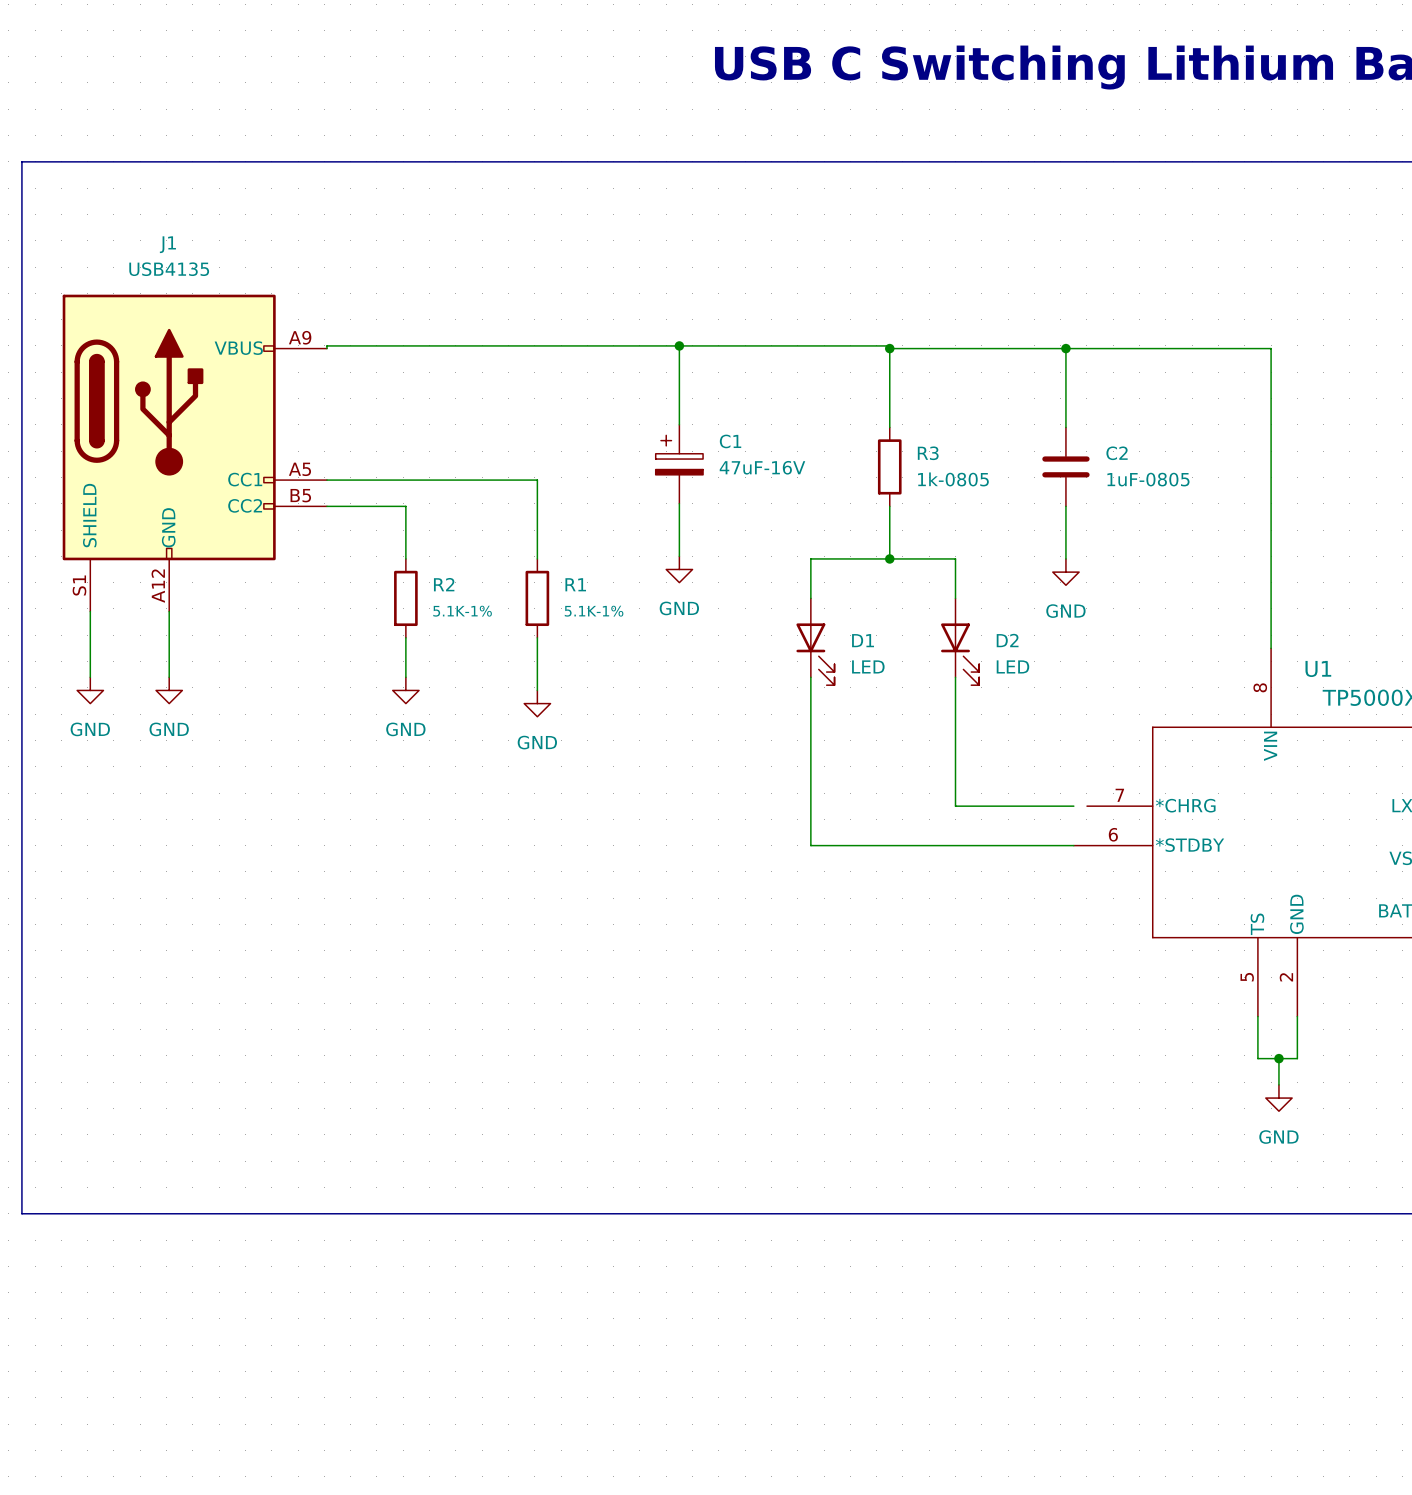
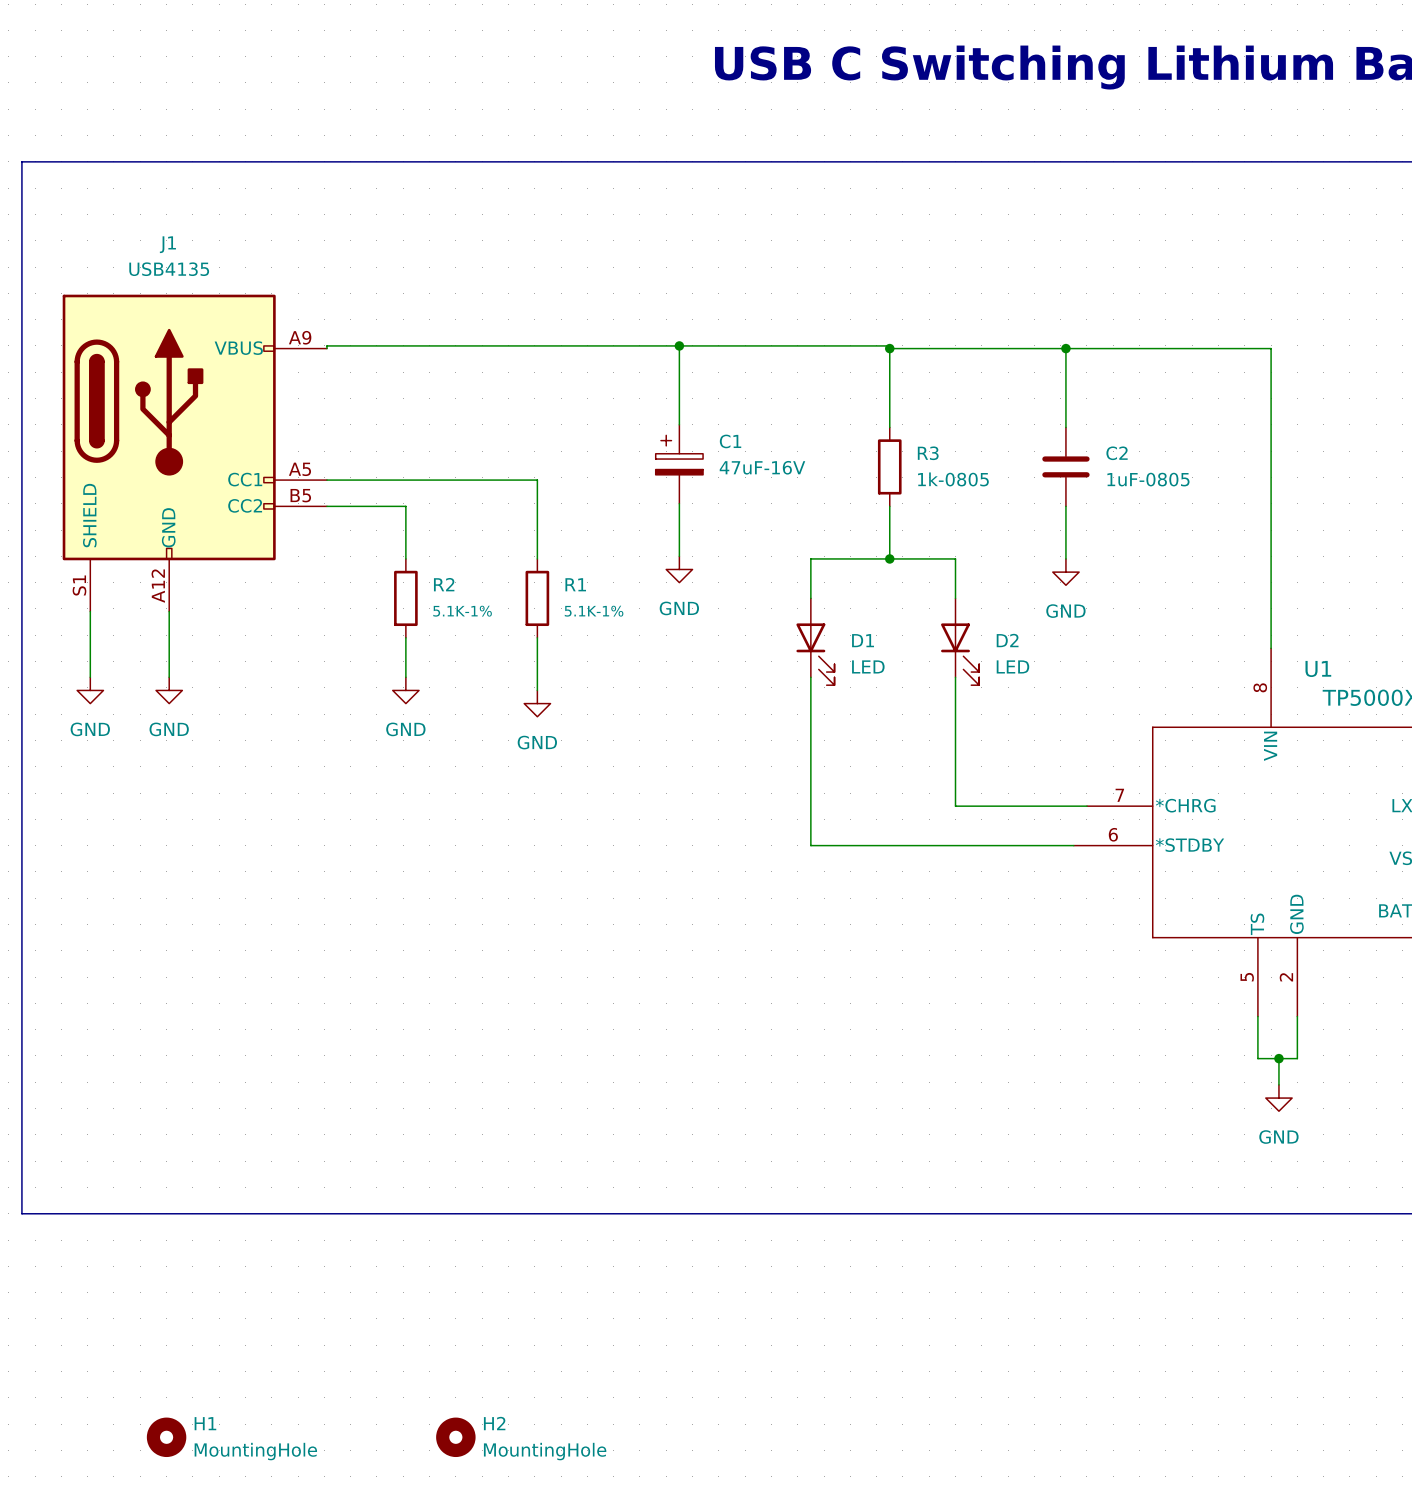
wire: none -> (1073, 806) (1086, 806)
H1: none -> MountingHole (166, 1437)
H2: none -> MountingHole (455, 1437)

